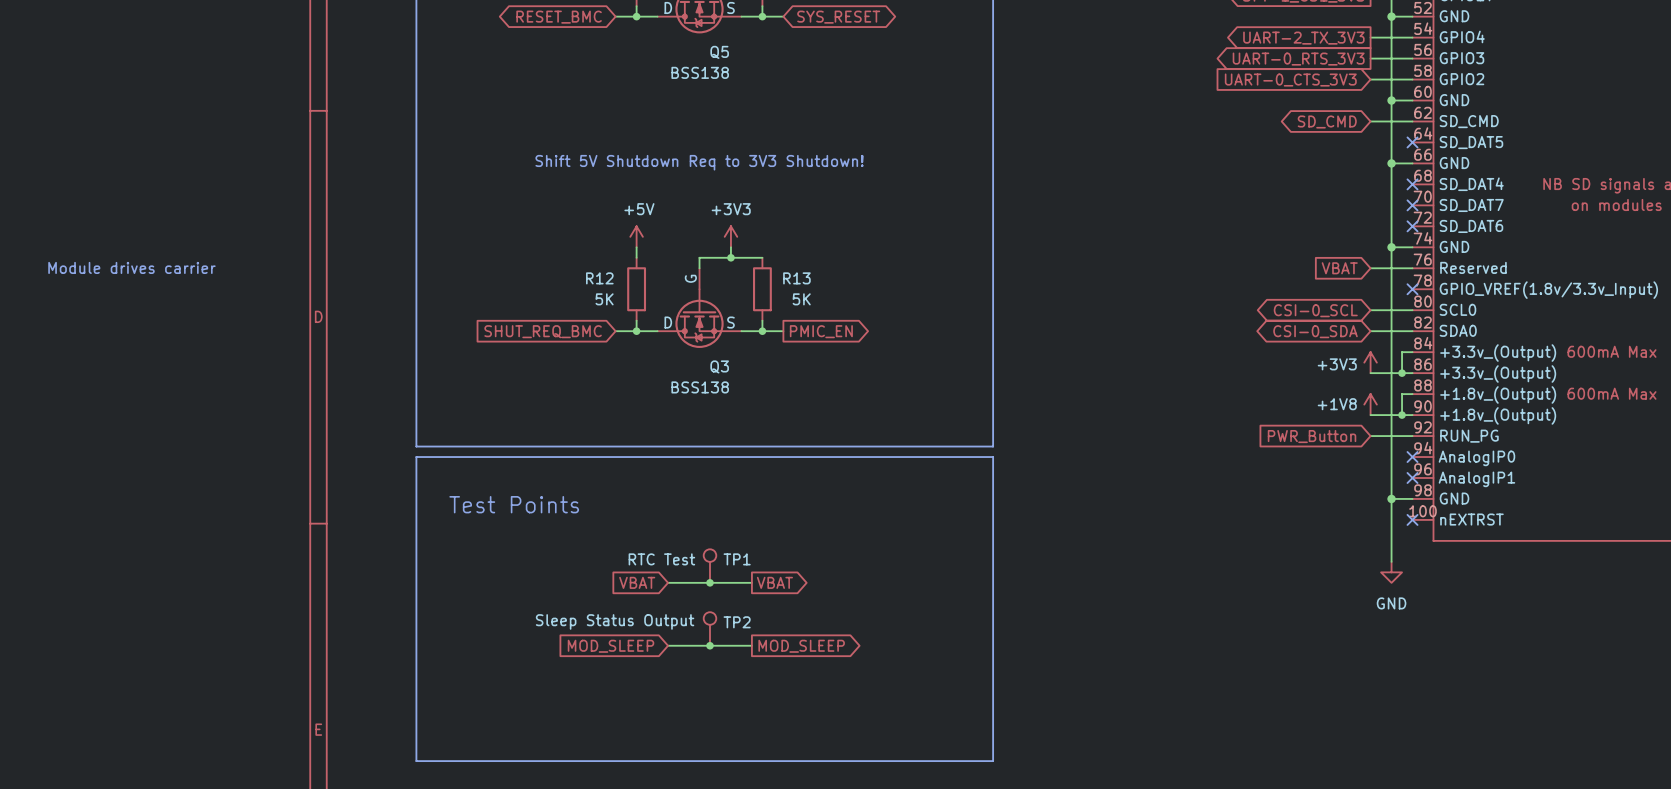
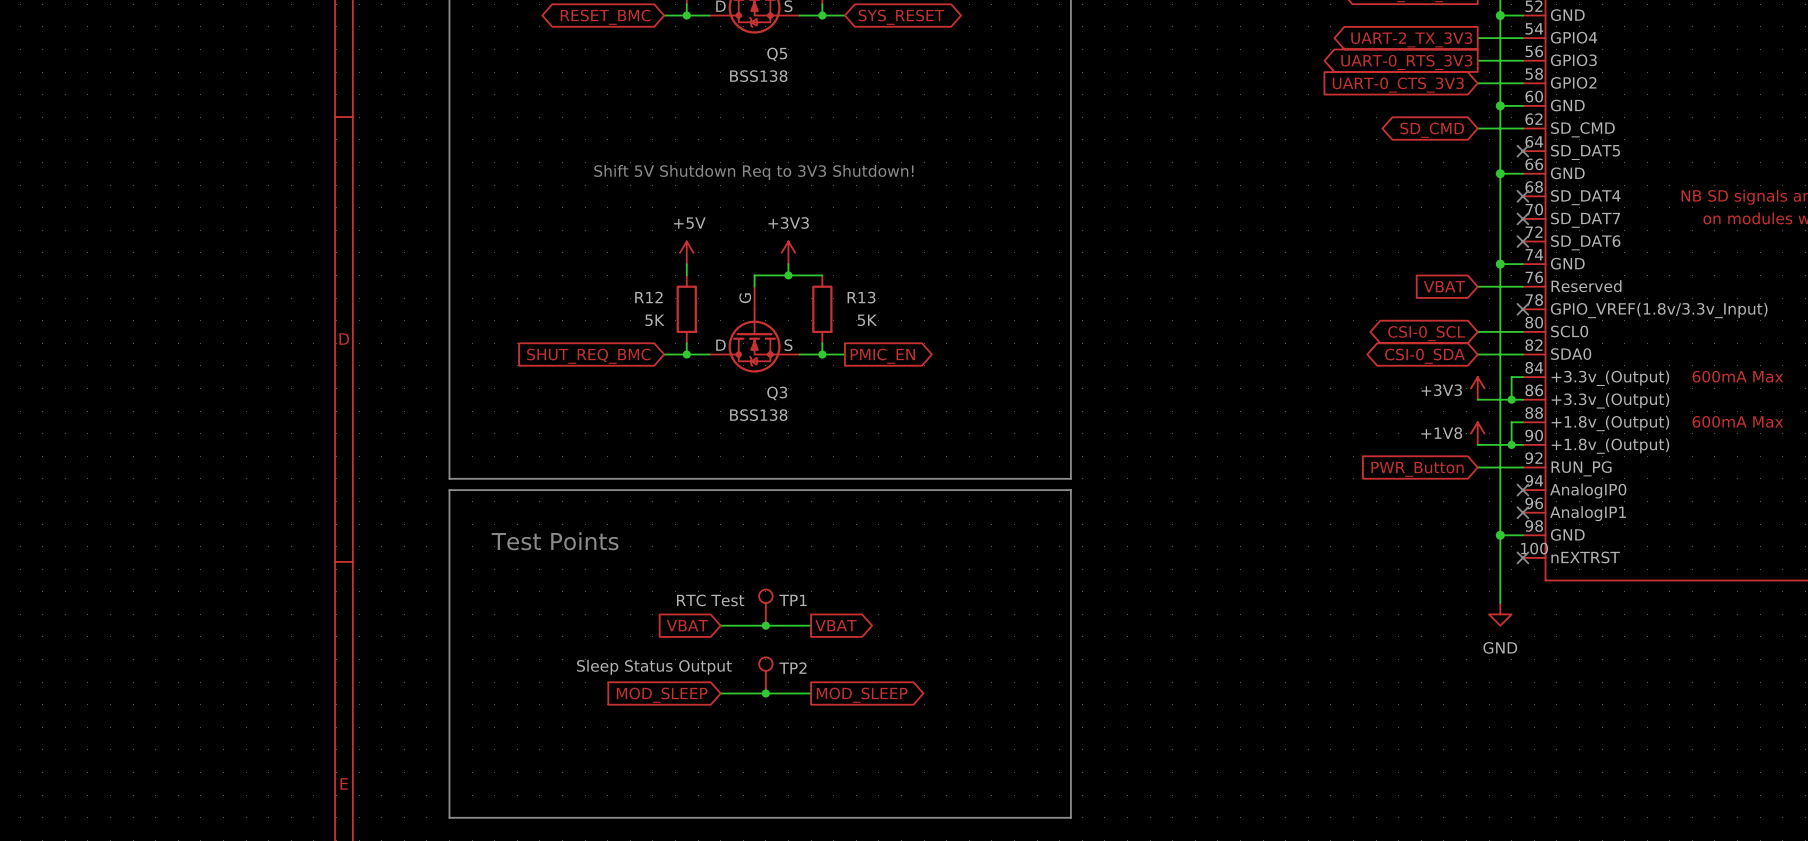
text: Module drives carrier (131, 267) -> none

